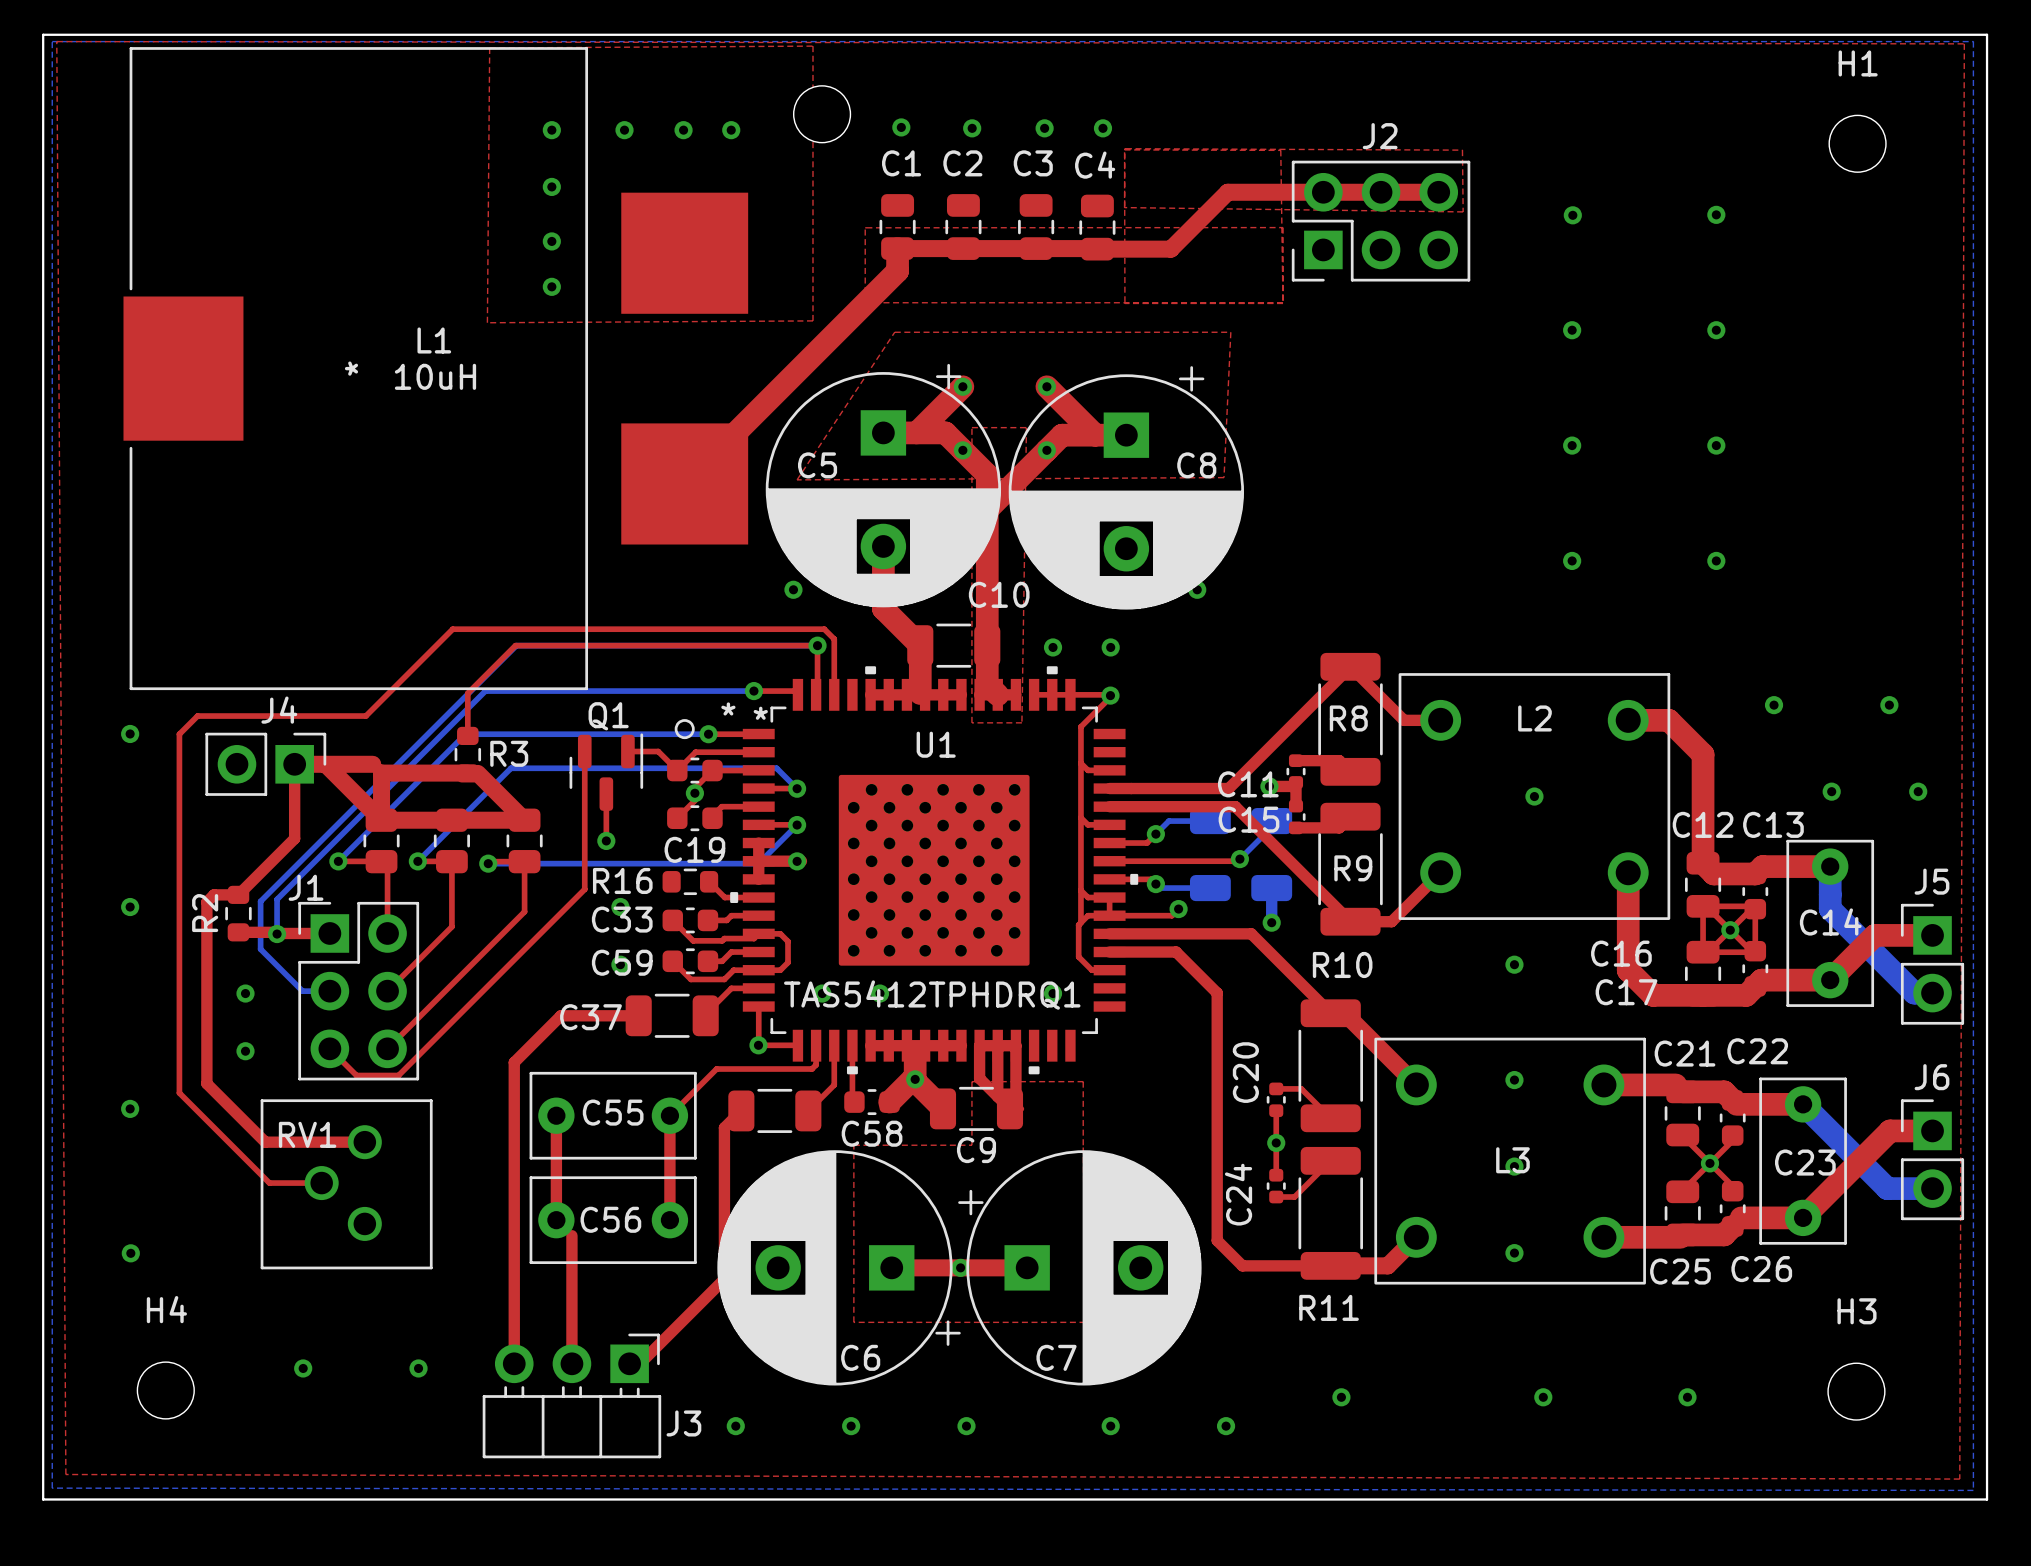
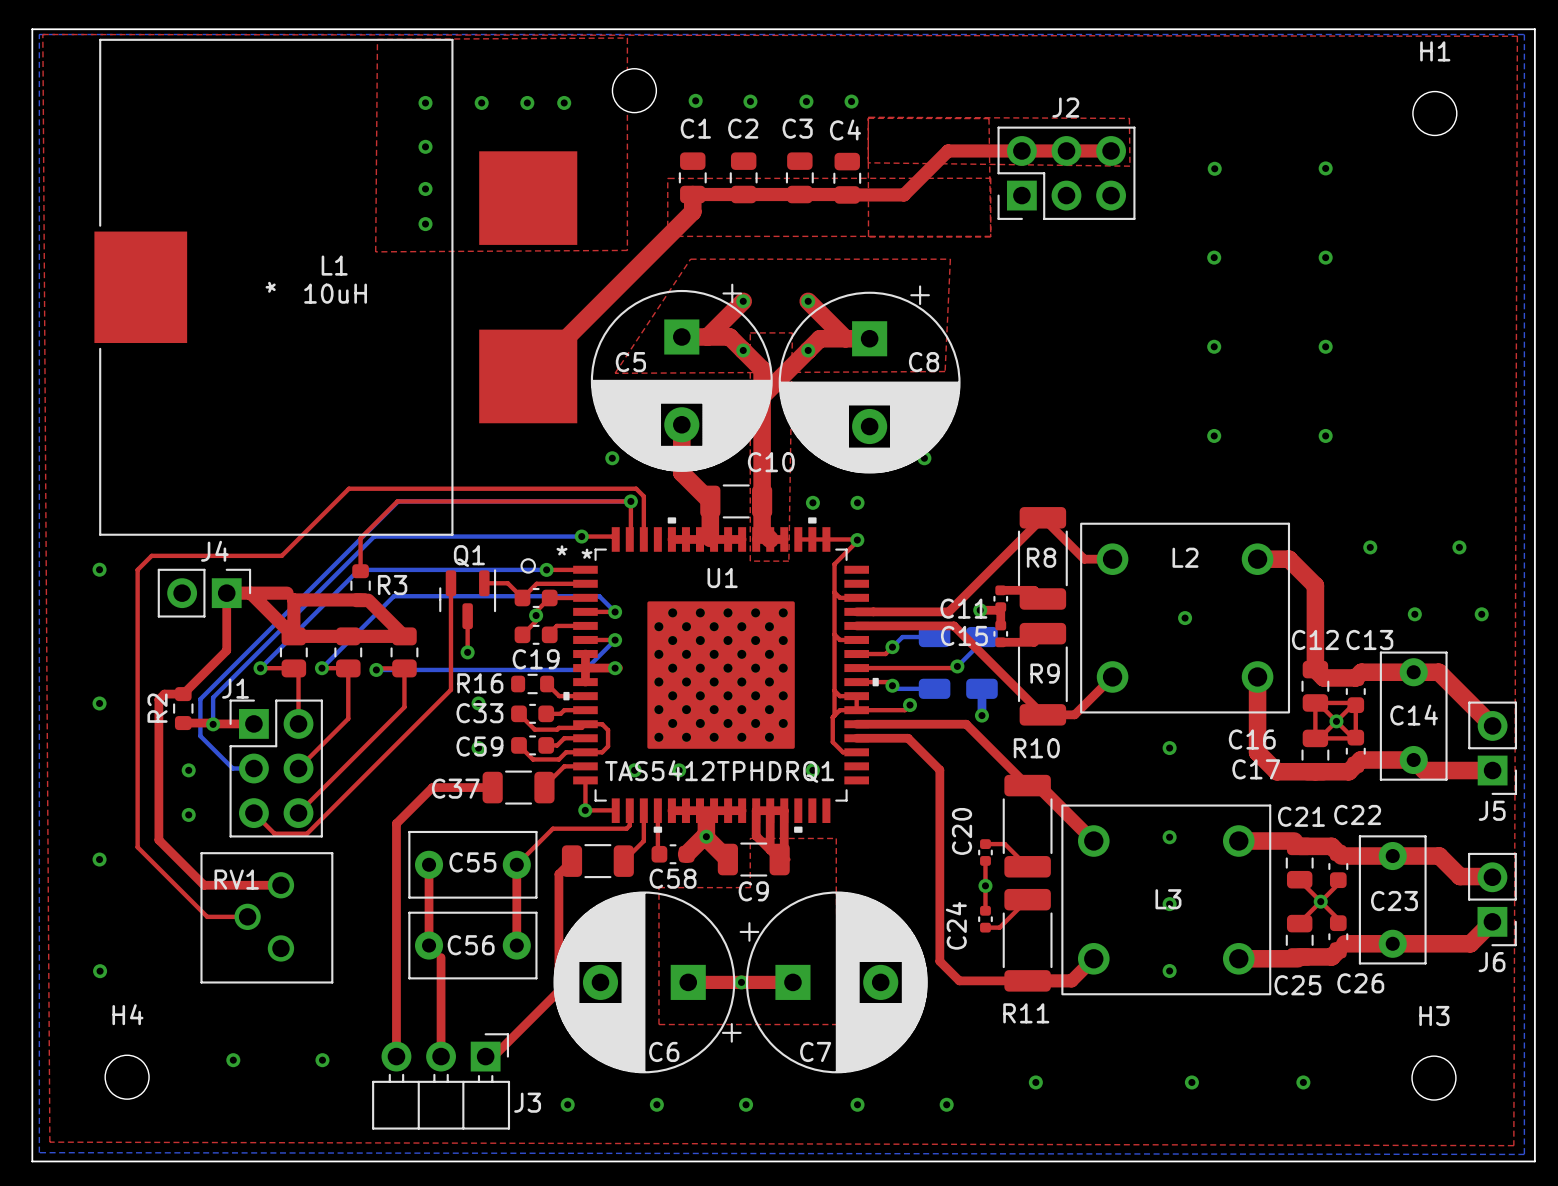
top track: none -> (1413, 672) (1438, 672) (1492, 725)
bottom track: (1830, 866) (1830, 908) (1914, 993) (1932, 993) -> none
top track: (1932, 935) (1874, 935) (1830, 980) -> (1492, 770) (1424, 770) (1413, 760)
J5 rotation: 0° (1932, 964) -> 180° (1492, 748)
top track: none -> (1392, 856) (1439, 856) (1459, 876)
bottom track: (1803, 1104) (1887, 1188) (1932, 1188) -> none
top track: (1890, 1130) (1803, 1217) -> (1492, 921) (1470, 943) (1392, 943)
J6 rotation: 0° (1932, 1159) -> 180° (1492, 899)

